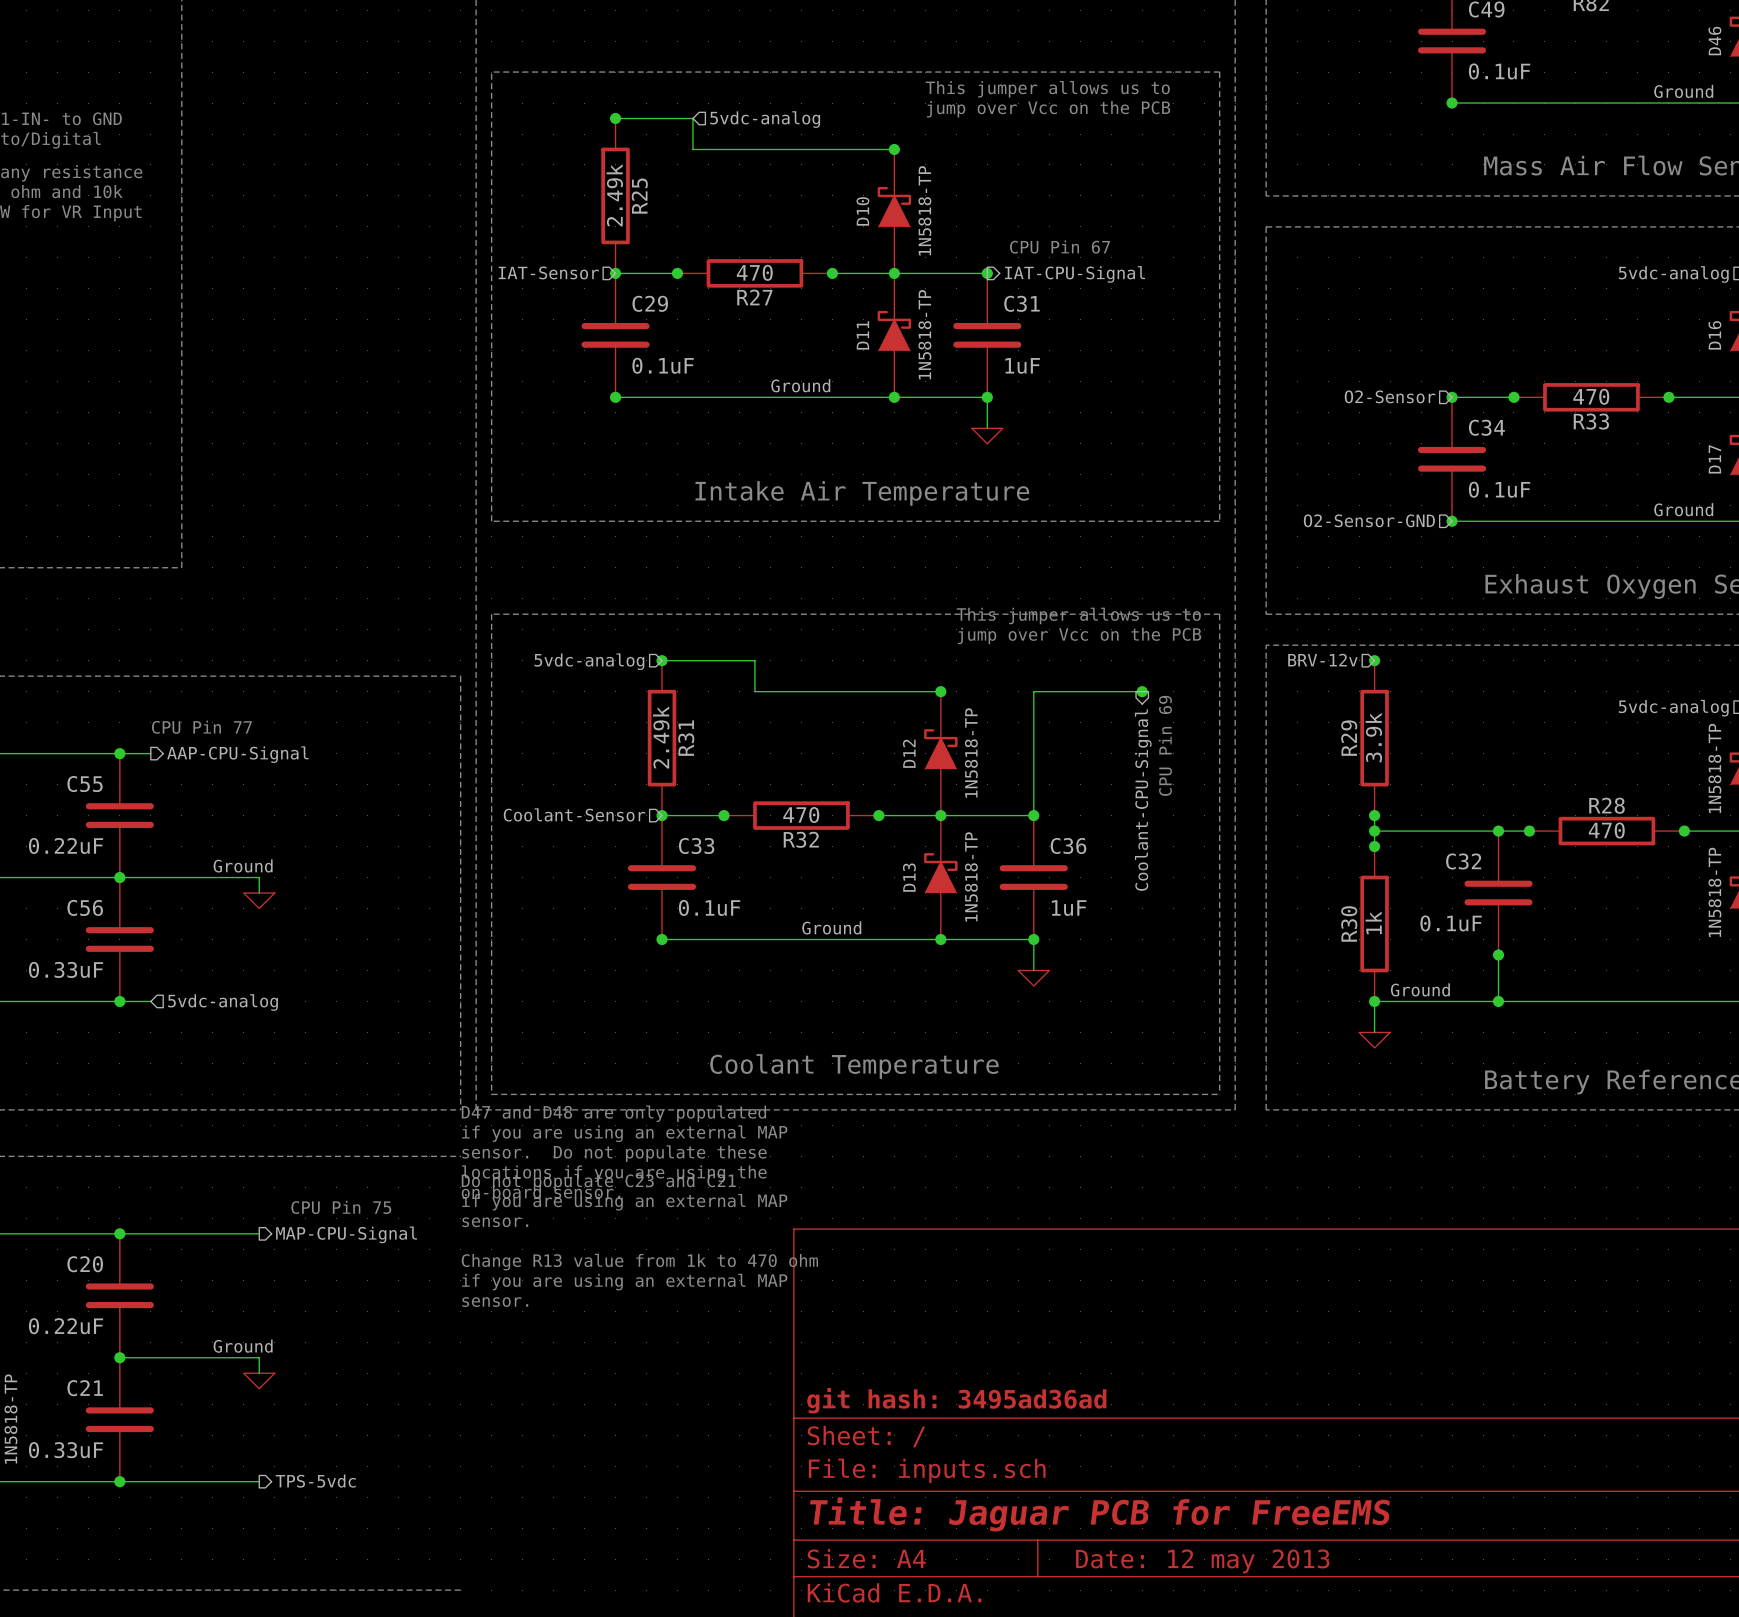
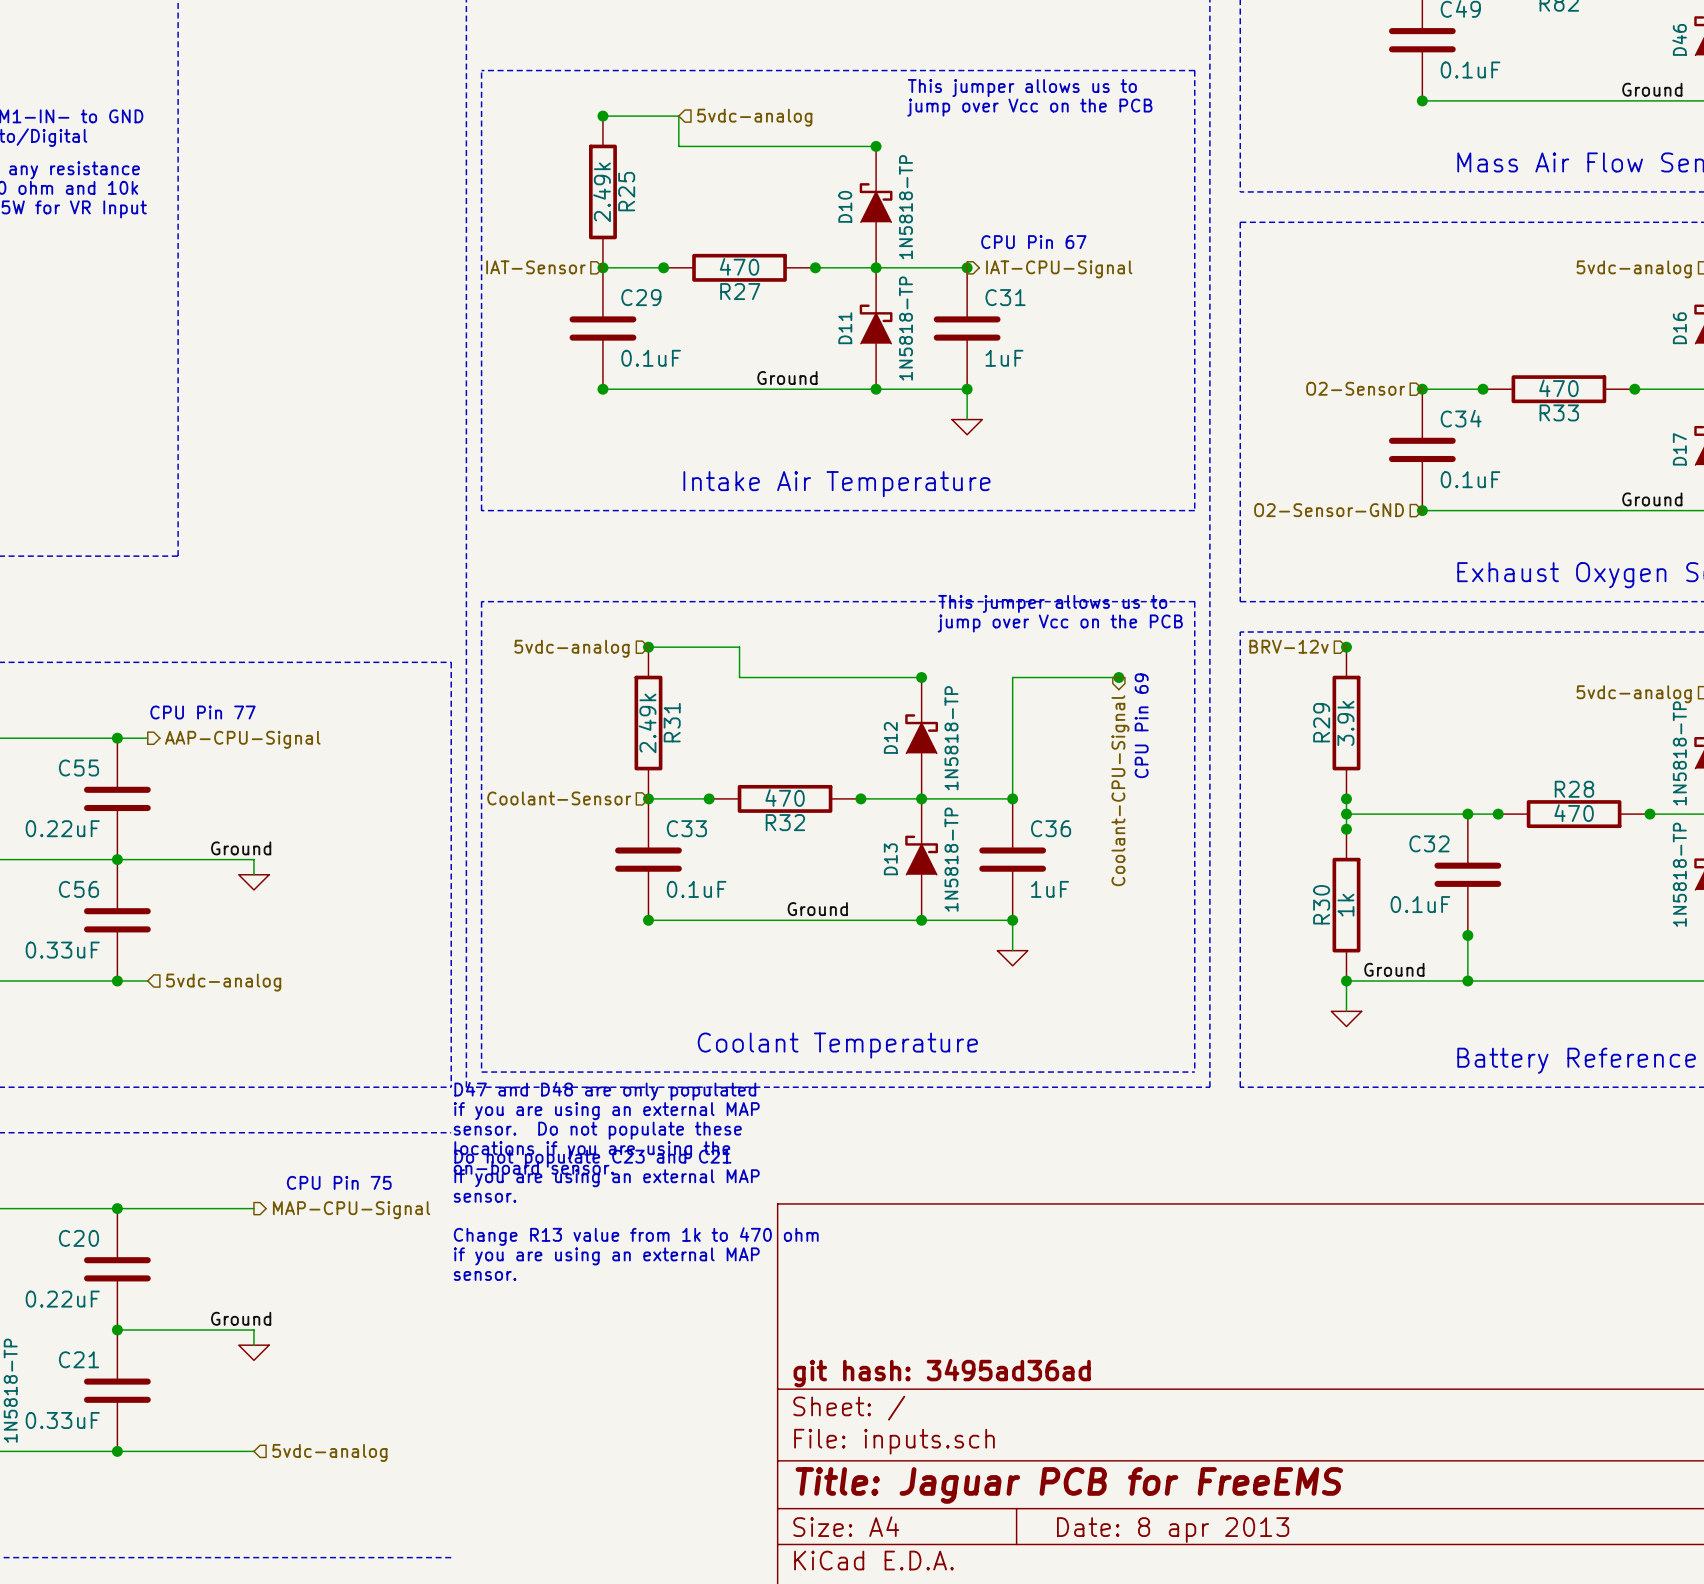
hierarchical label shape: output (315, 1481) -> input (329, 1452)
hierarchical label: TPS-5vdc (315, 1481) -> 5vdc-analog (329, 1452)
title block: Date: 12 may 2013 (1202, 1561) -> Date: 8 apr 2013 (1173, 1530)

